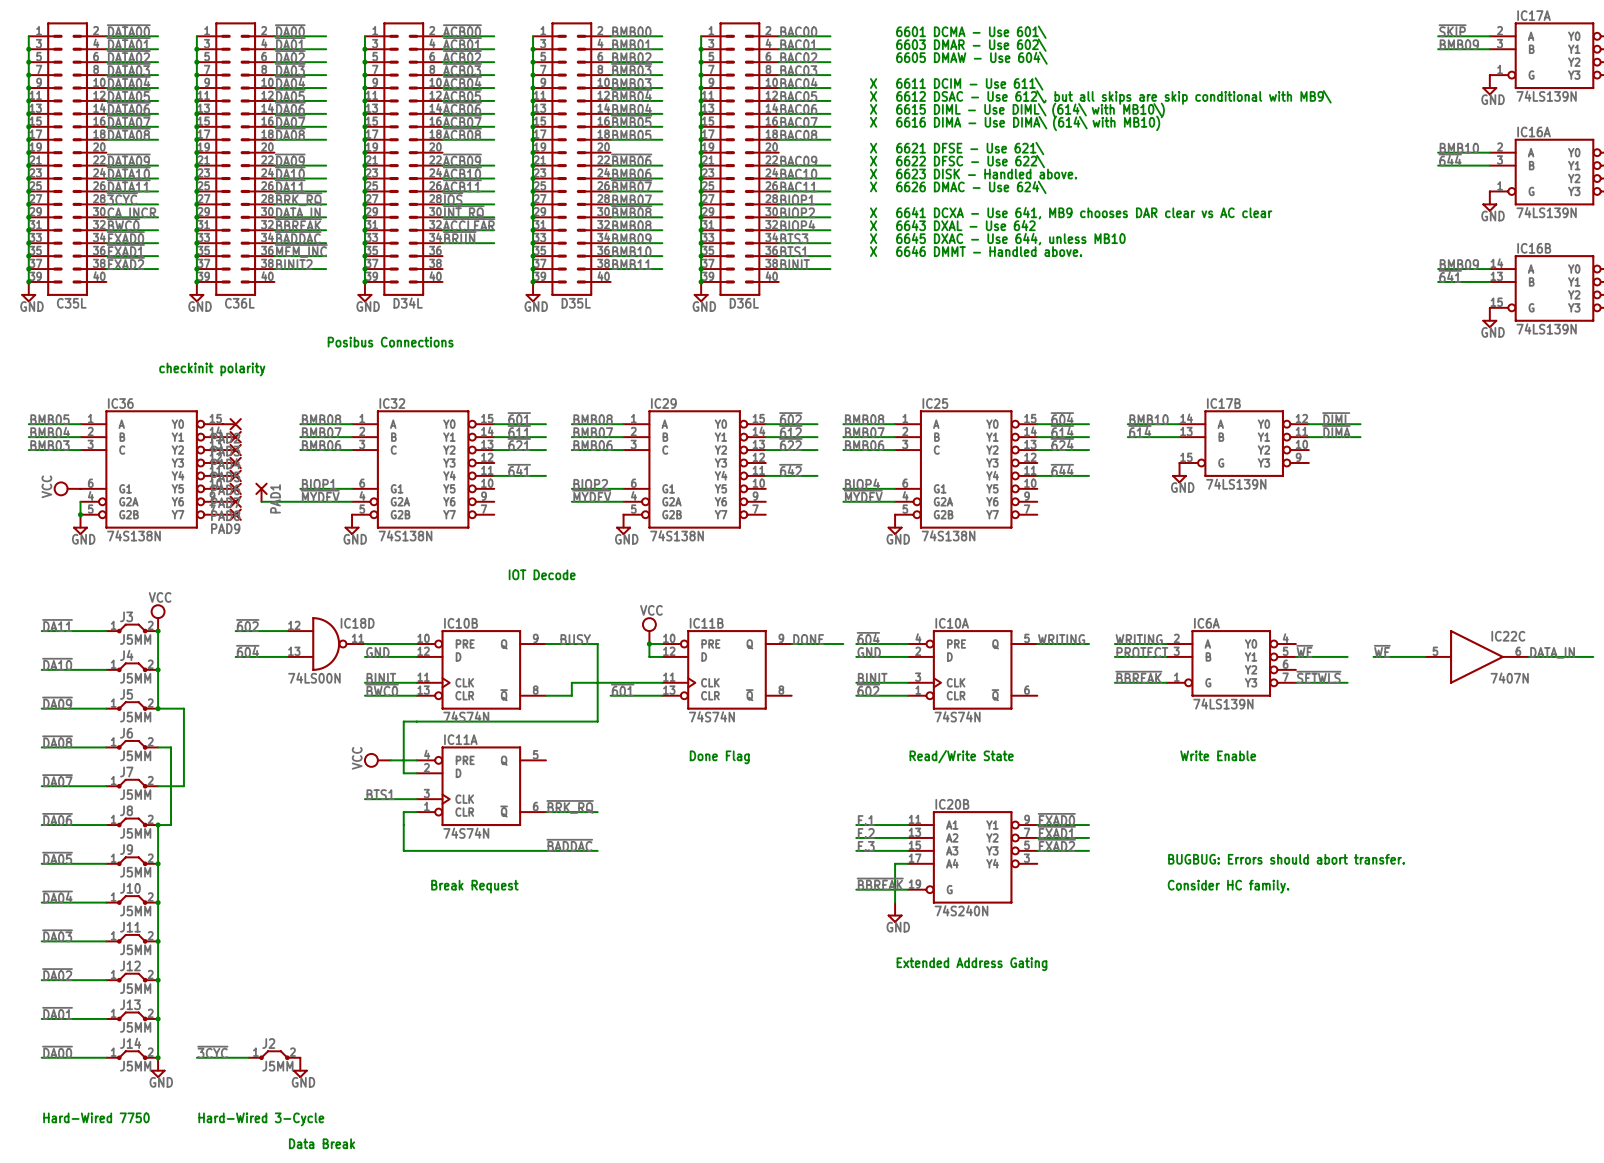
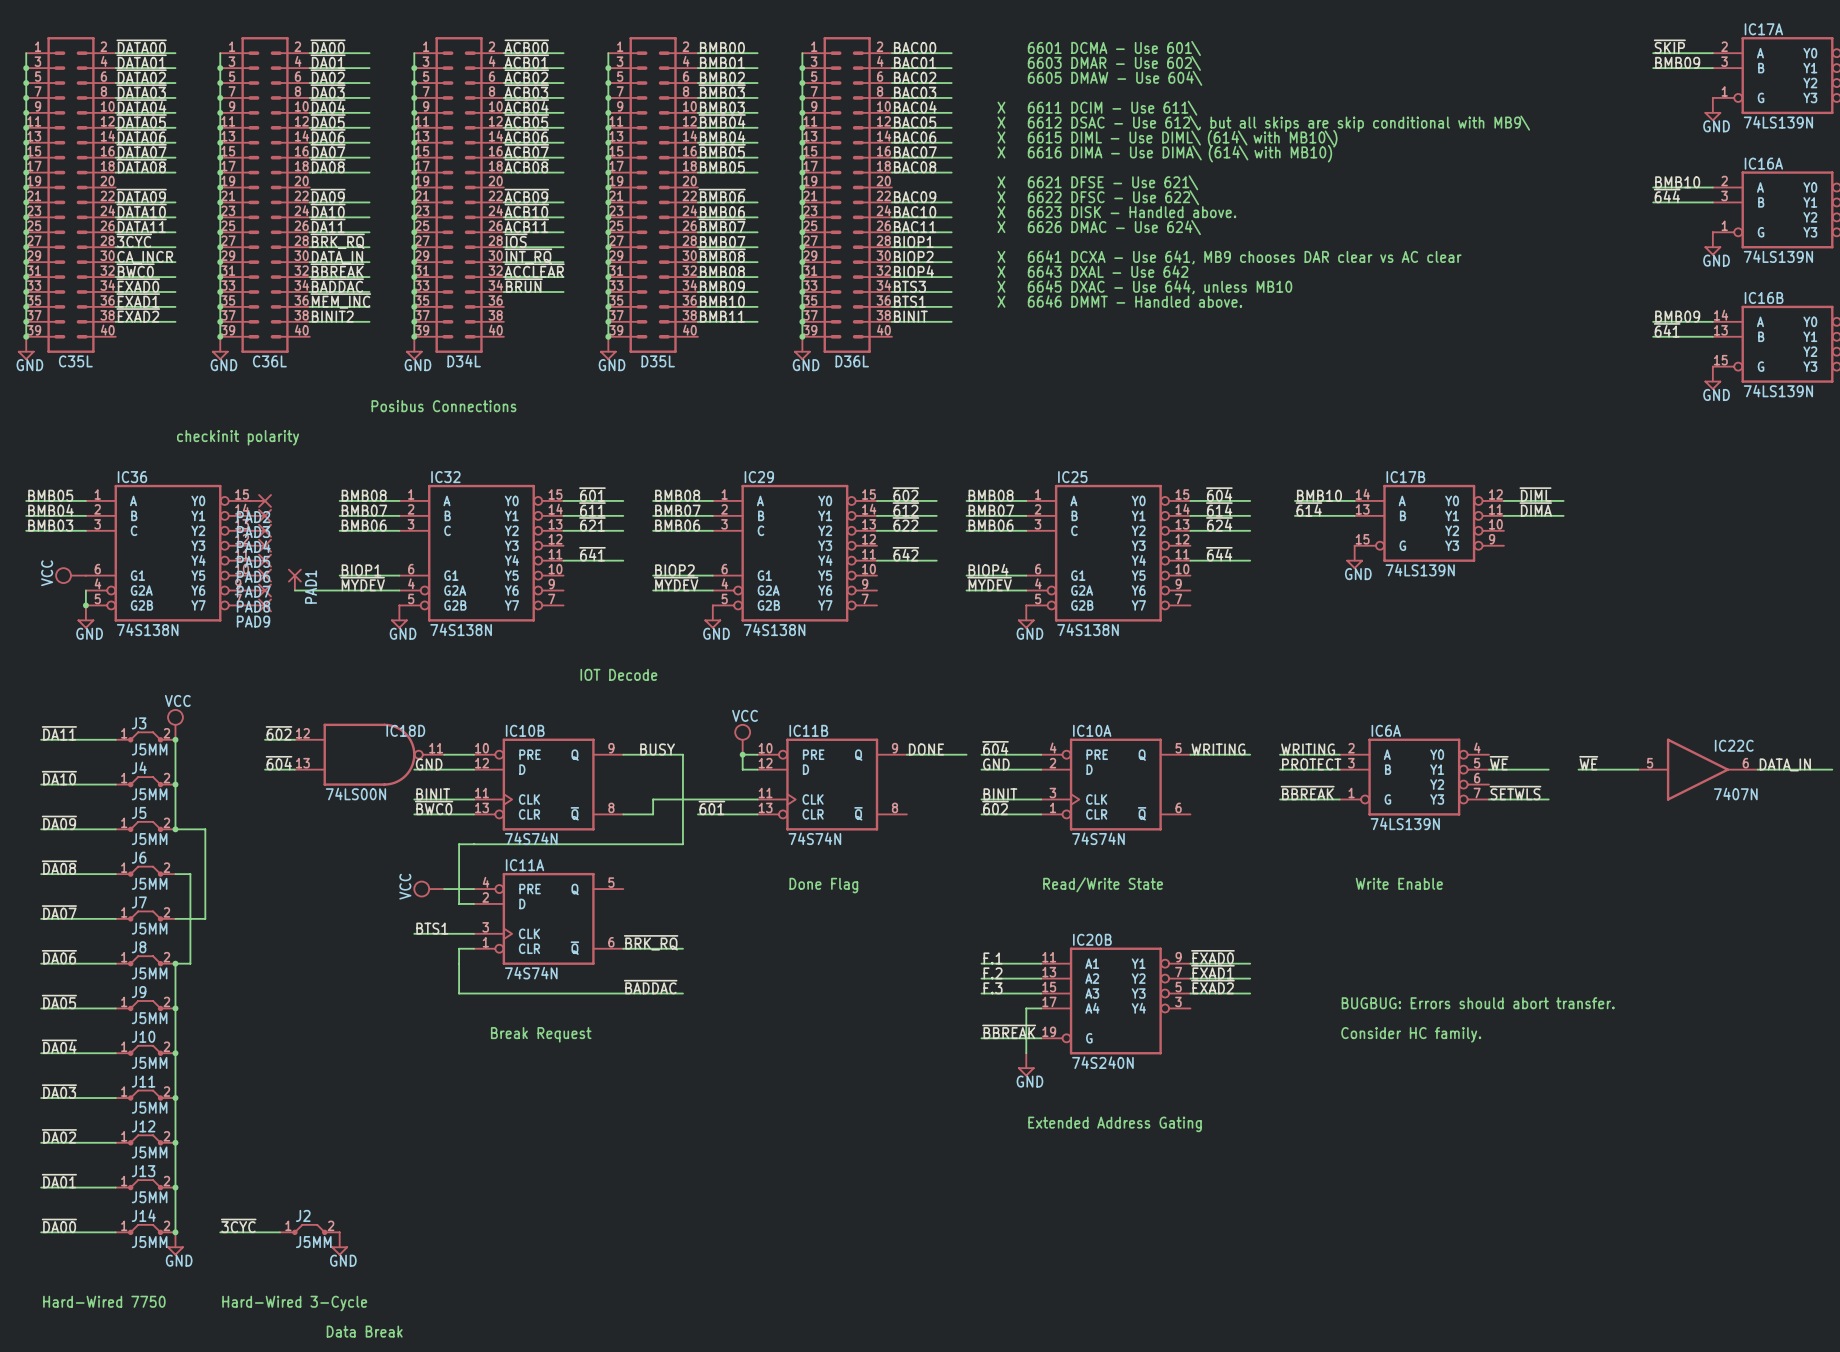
IC18D symbol: [287, 617, 365, 671] -> [294, 723, 445, 786]

